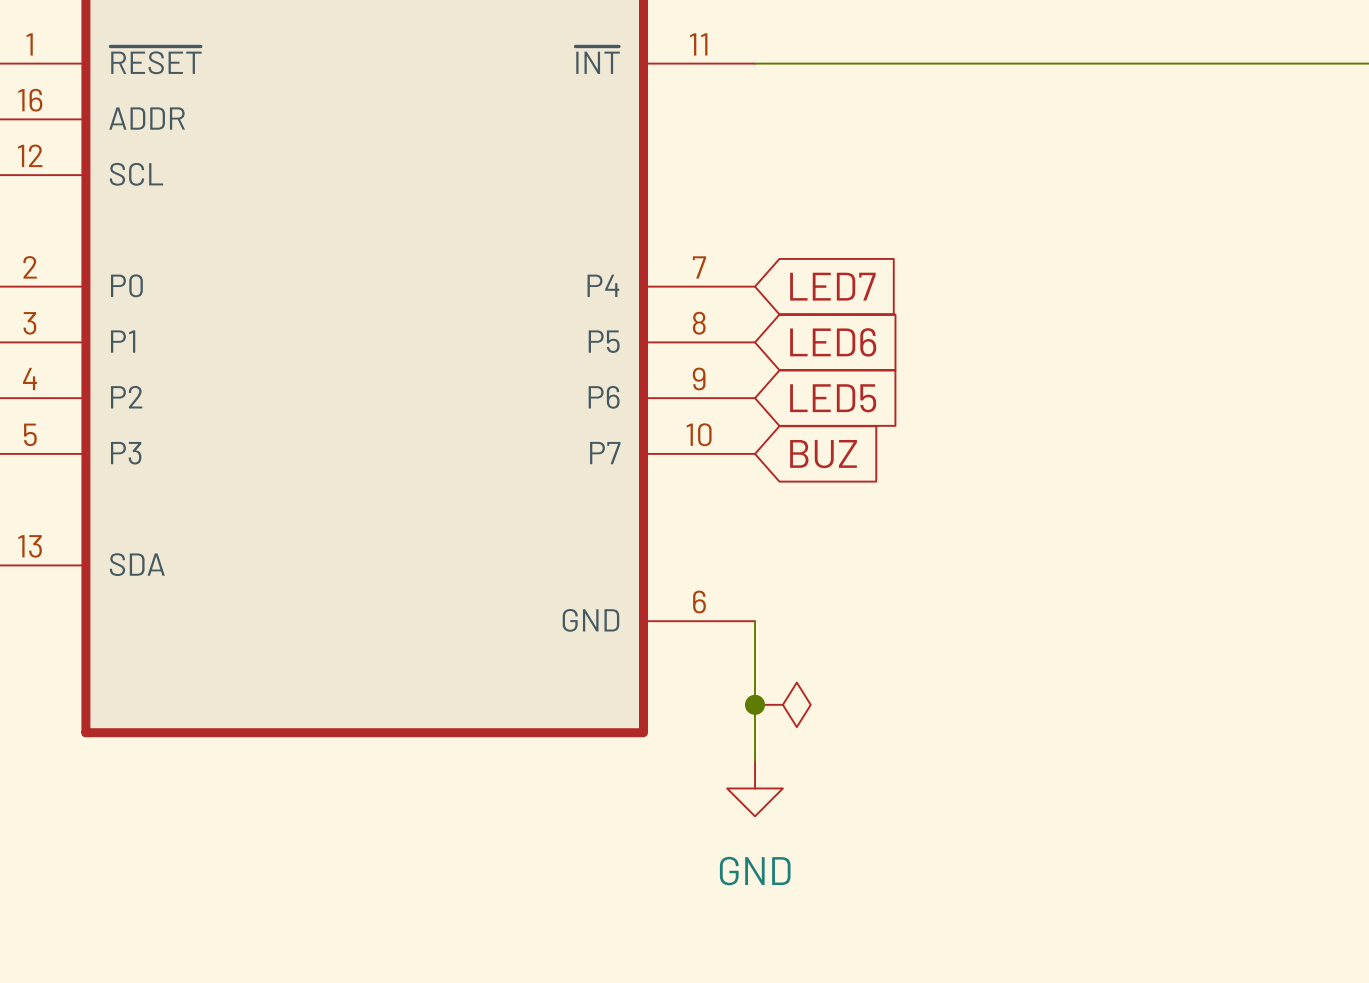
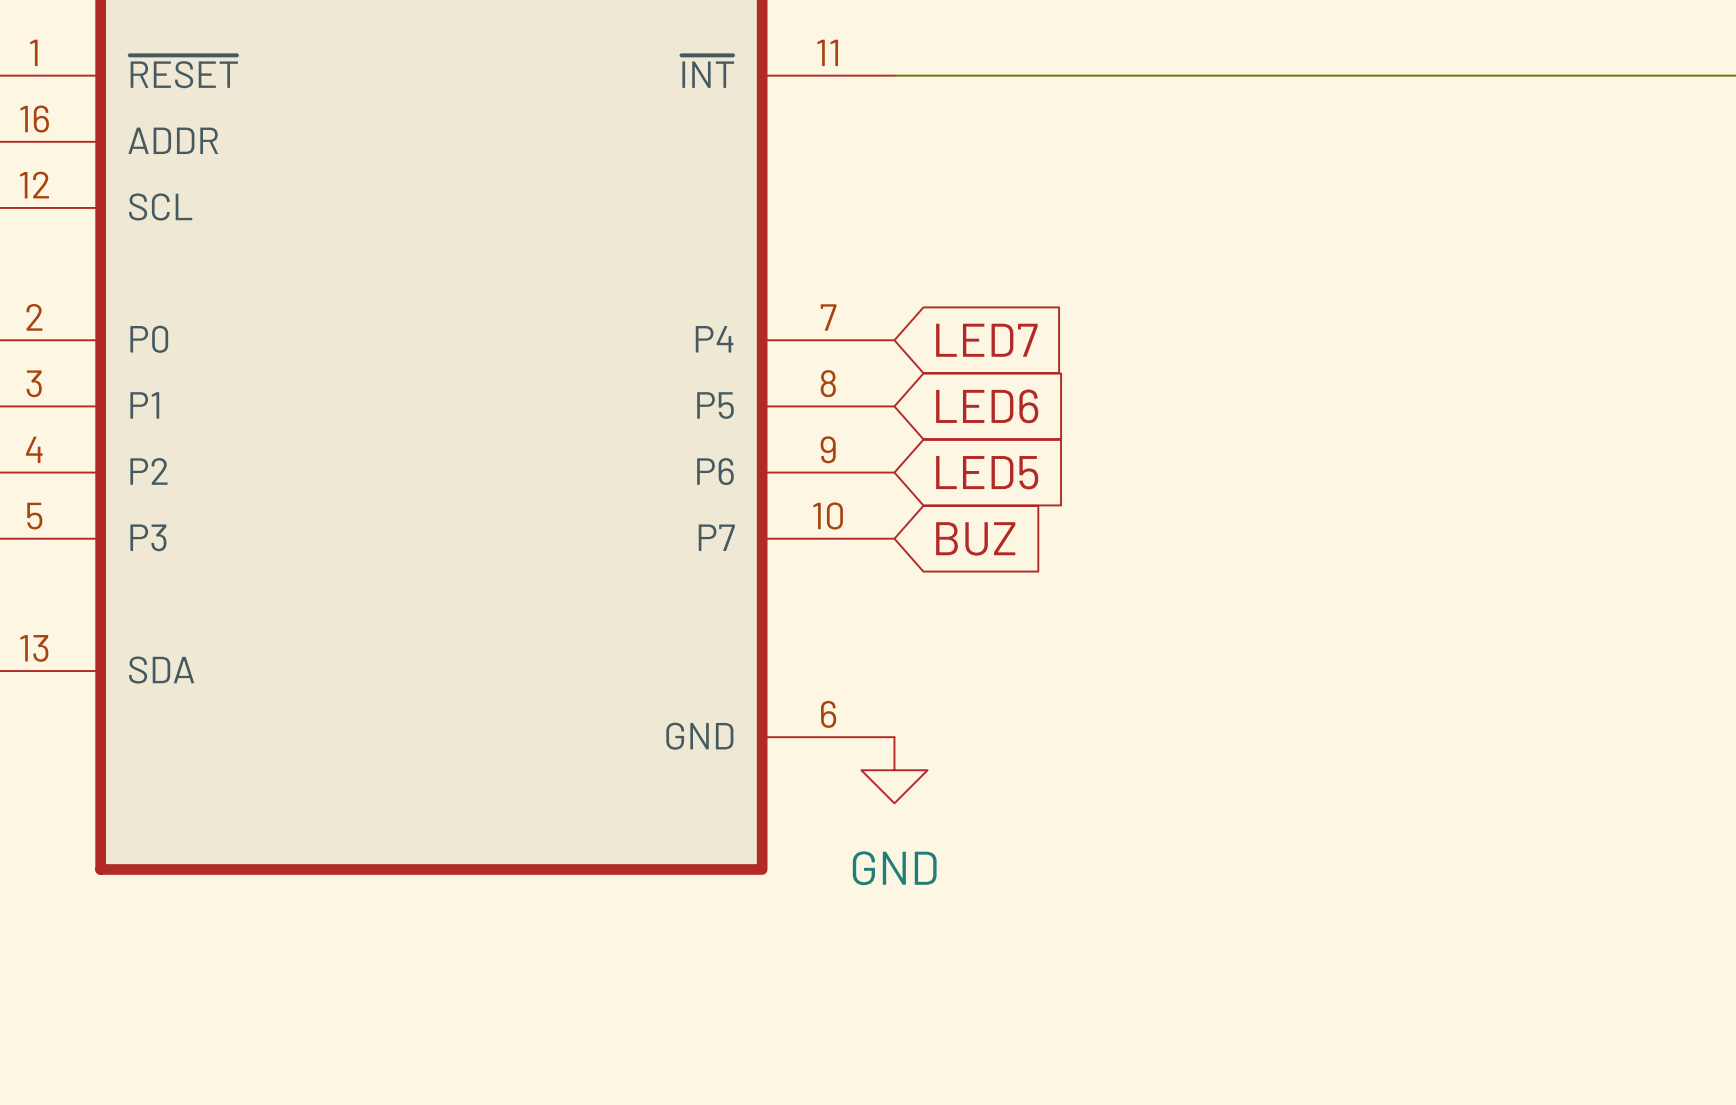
wire: (755, 621) (755, 760) -> none
junction: (755, 704) -> none
power symbol: (782, 704) -> none
power symbol position: GND (755, 788) -> GND (894, 770)

